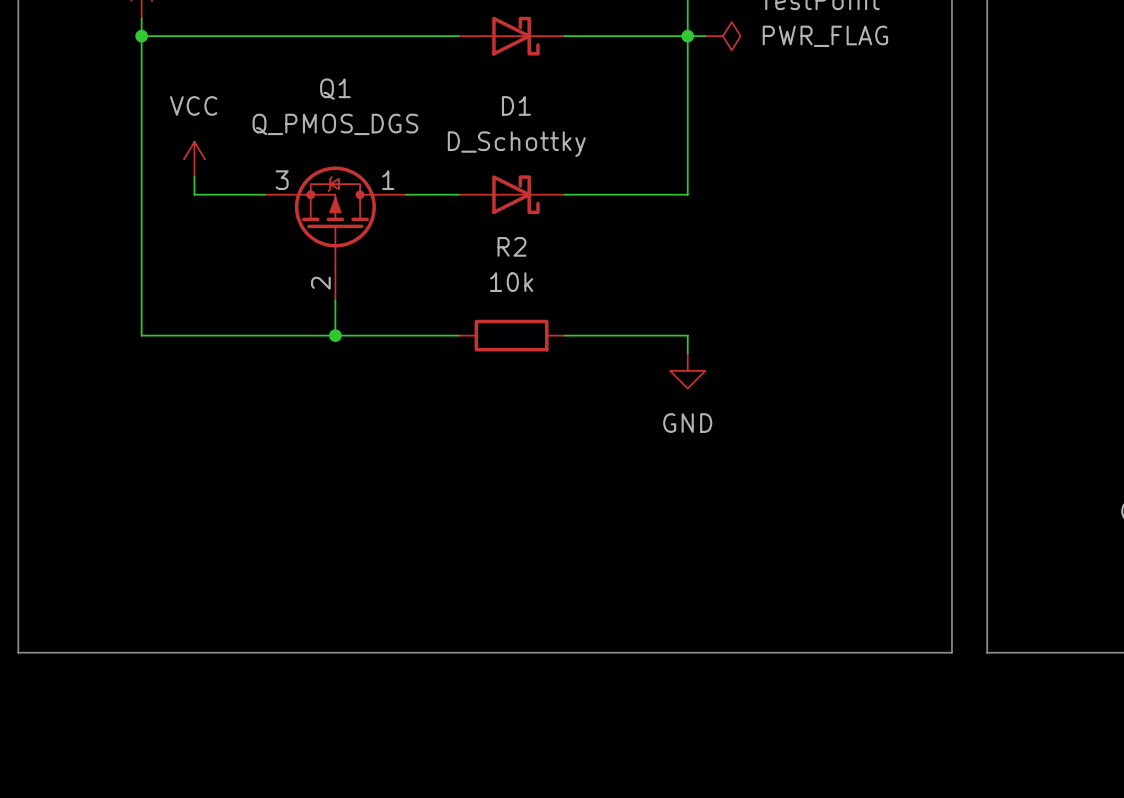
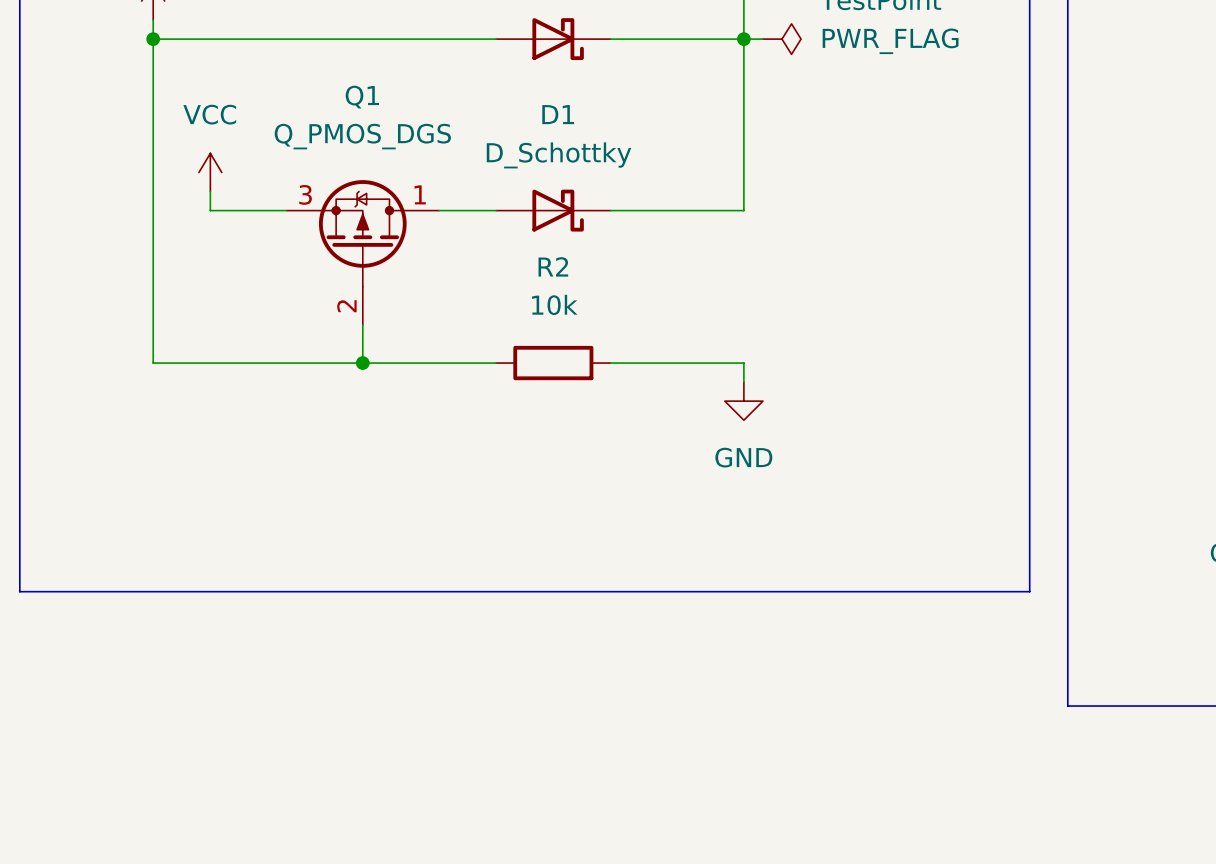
line: (18, 547) (18, 652) (951, 652) (951, 547) -> (19, 591) (1029, 591)

